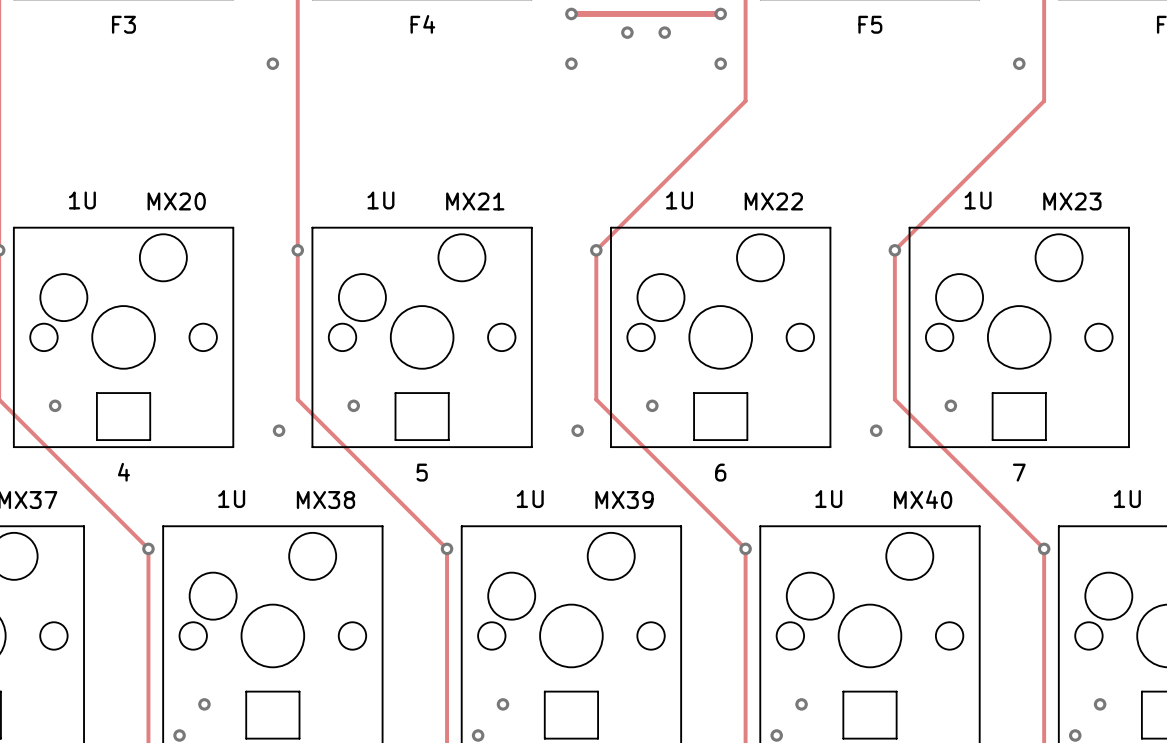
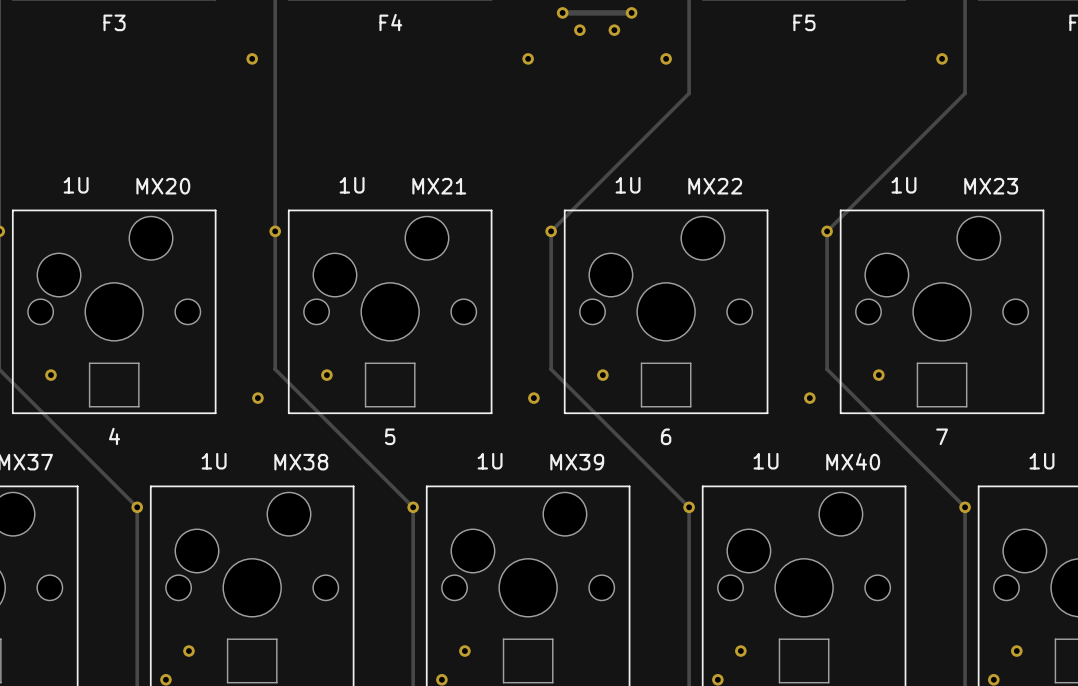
track: (571, 13) (608, 13) -> none
via position: (571, 13) -> (562, 12)
track: (683, 13) (720, 13) -> none
via position: (720, 13) -> (631, 12)

